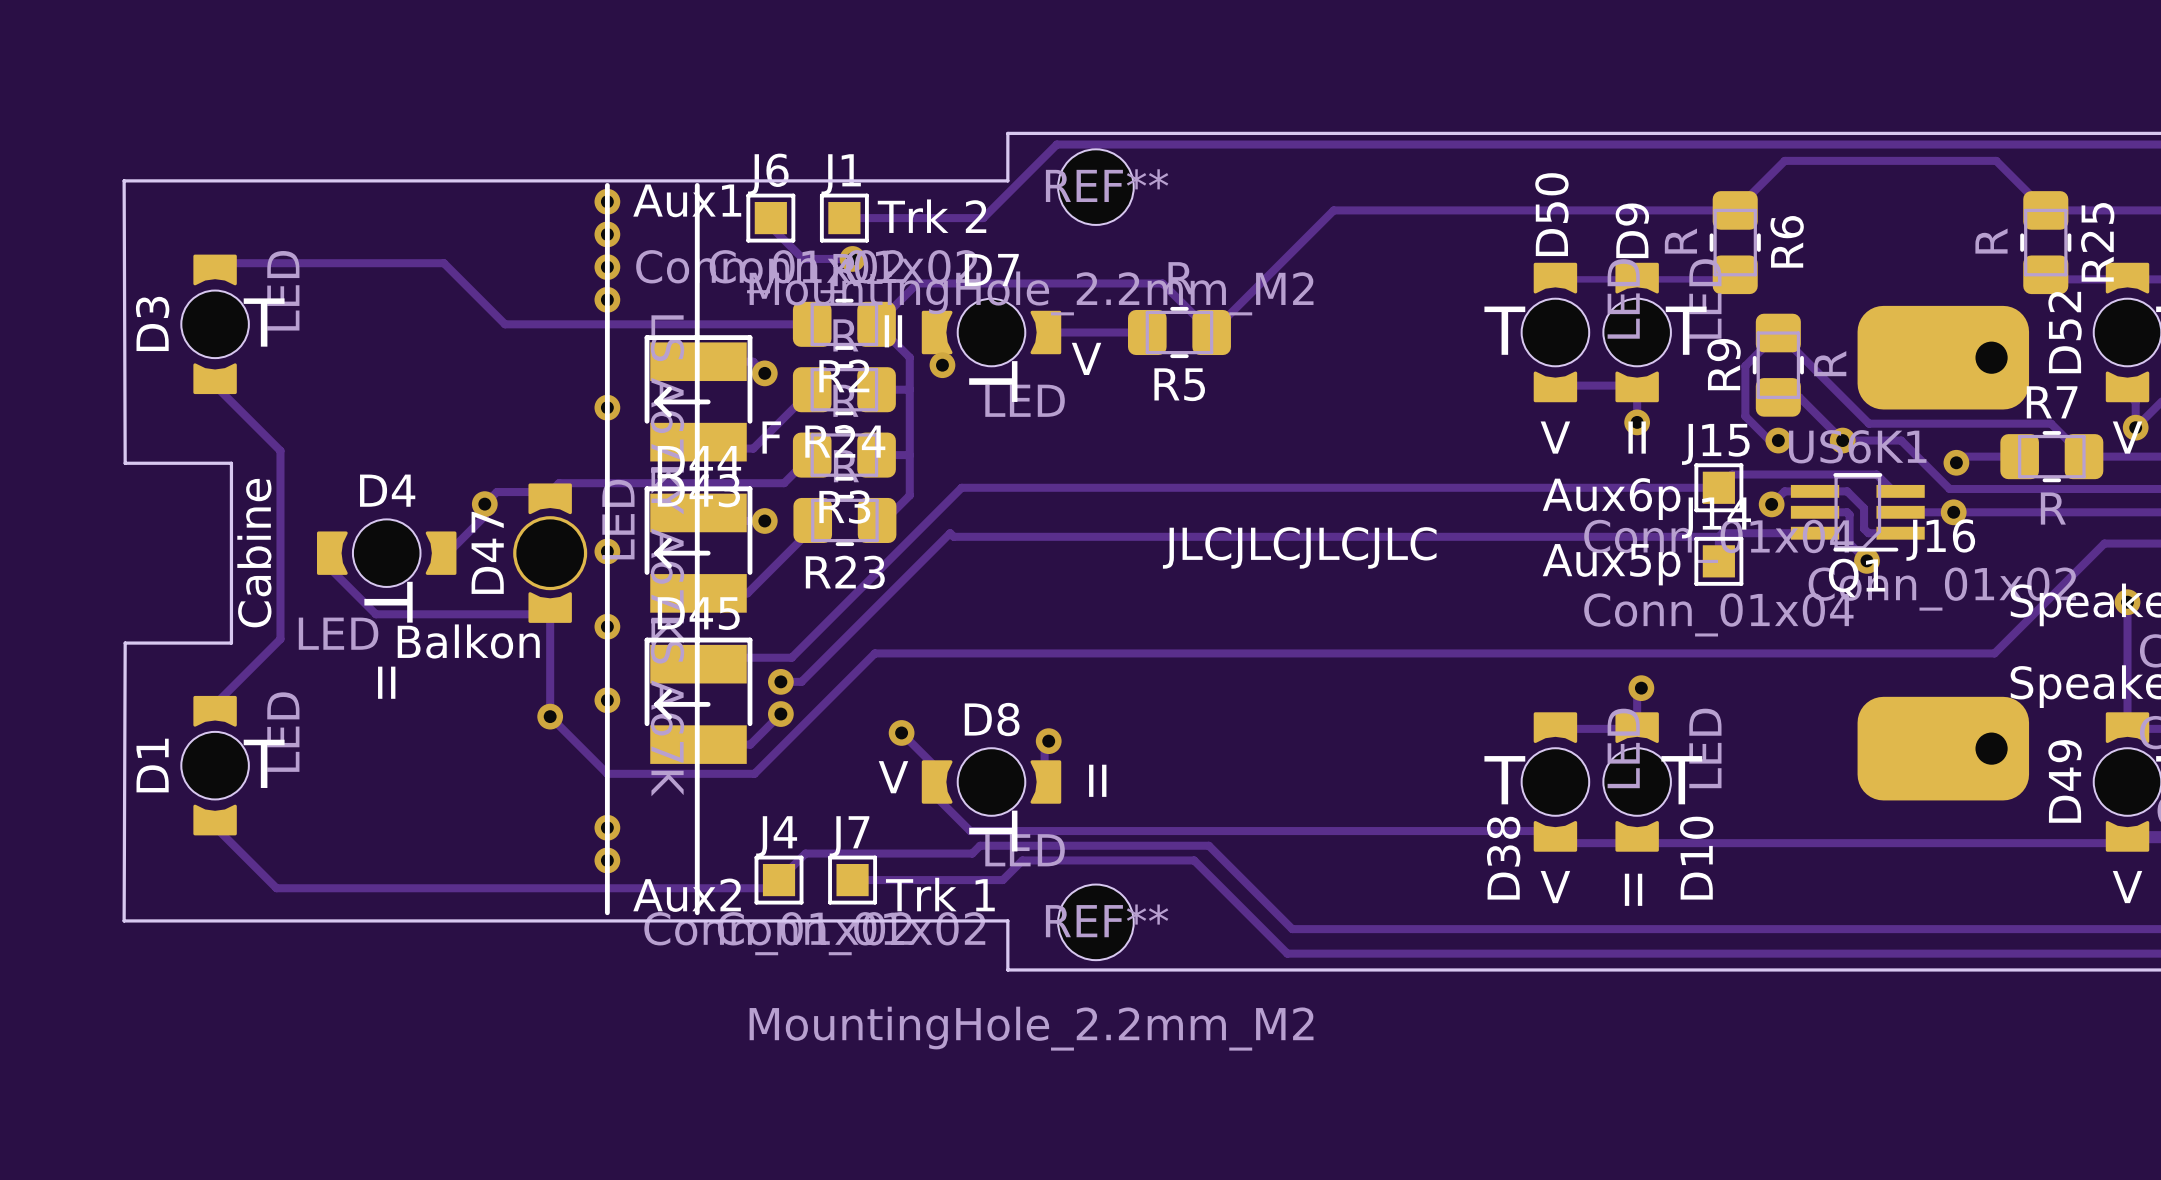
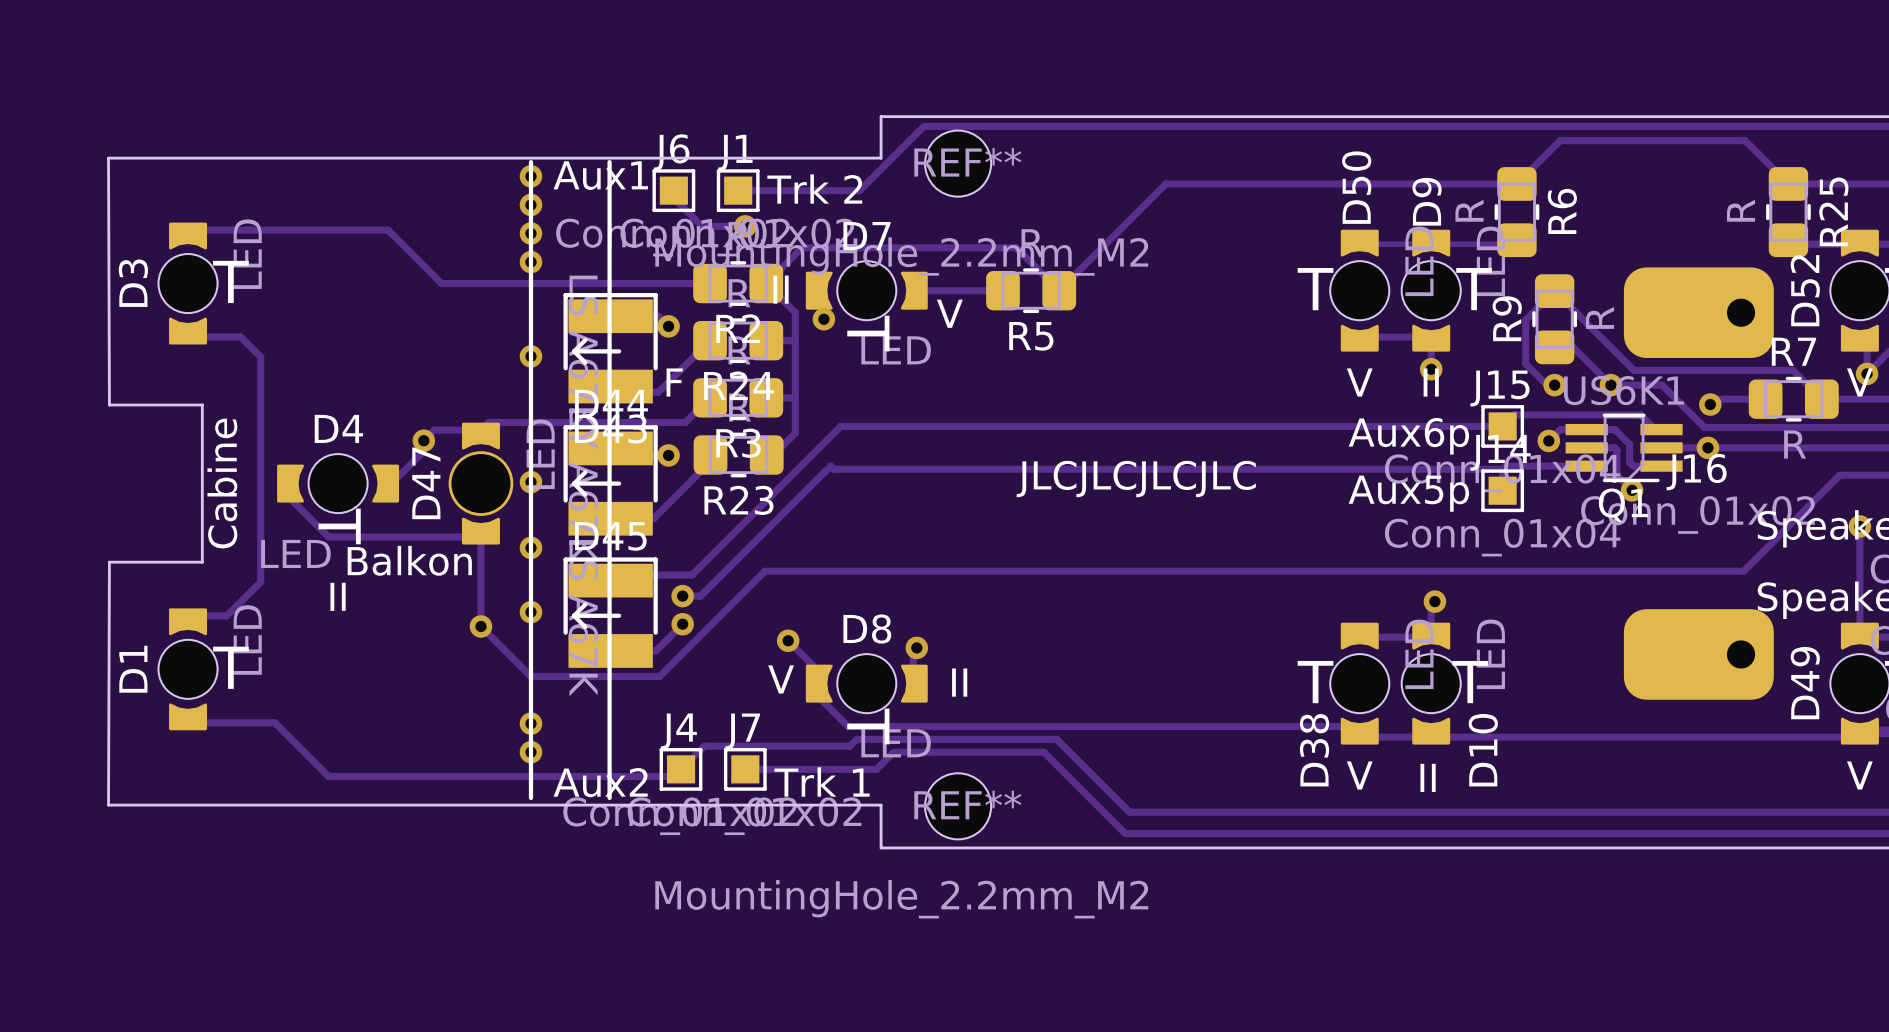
track: (215, 385) (280, 450) (280, 639) (215, 704) -> (188, 336) (240, 336) (260, 357) (260, 582) (226, 615) (188, 615)
track: (215, 826) (276, 888) (375, 888) -> (188, 722) (274, 722) (328, 776)

